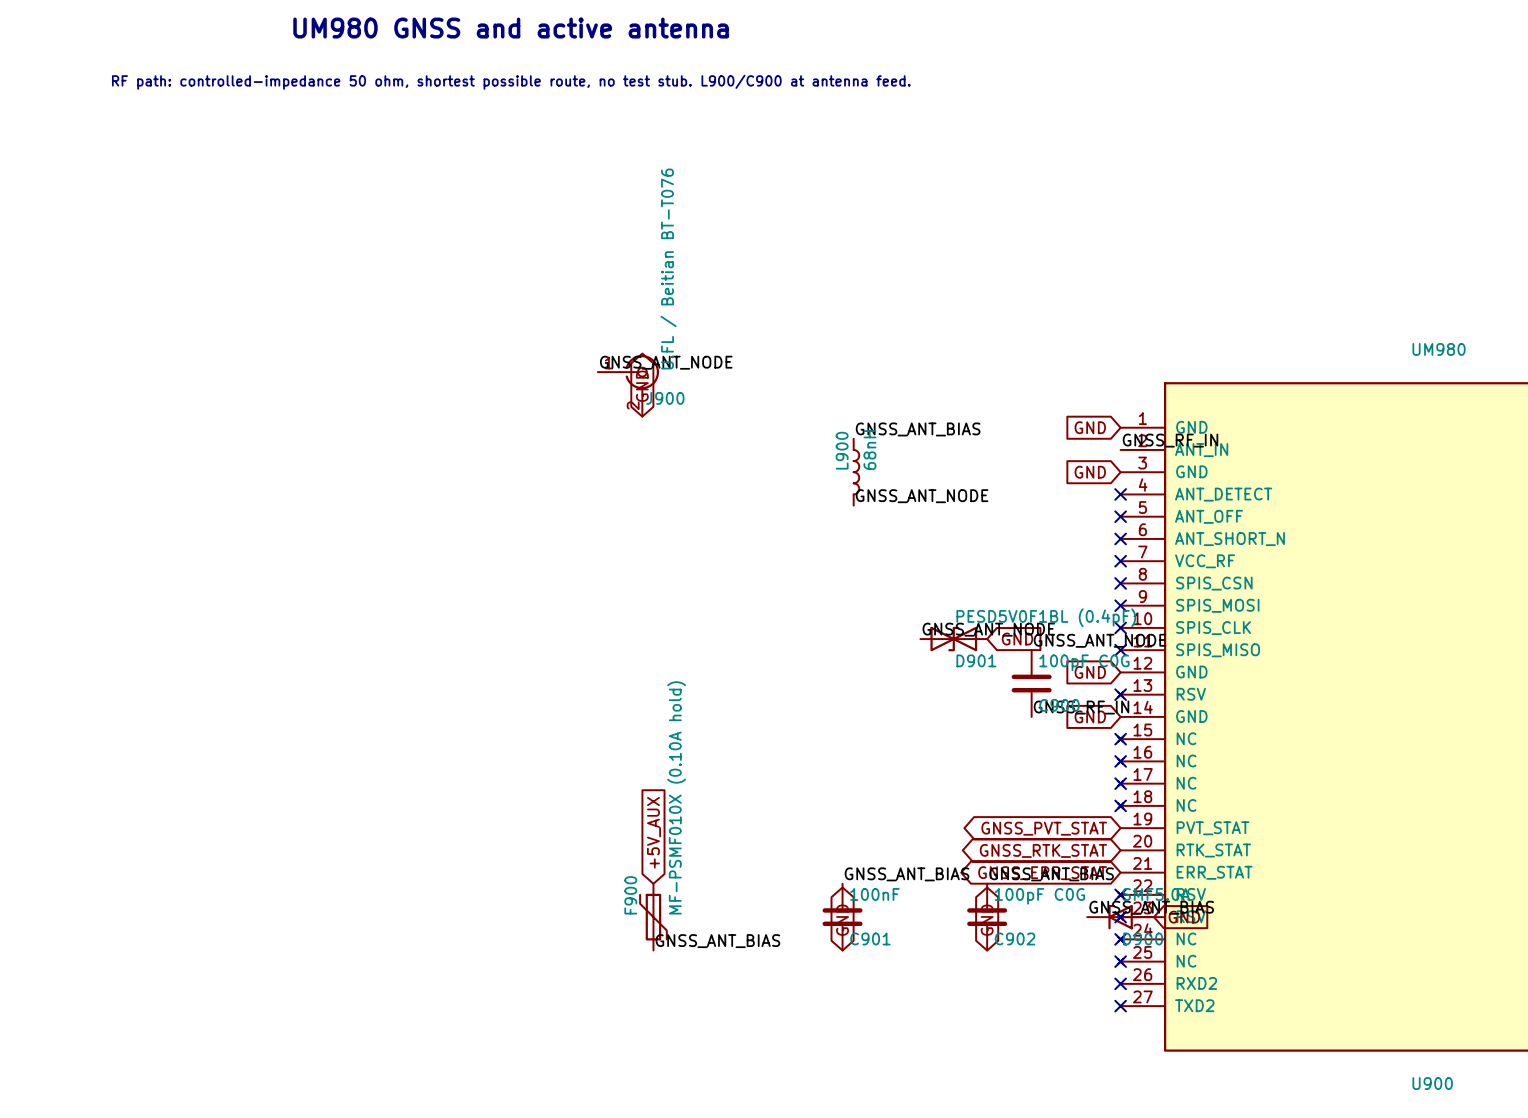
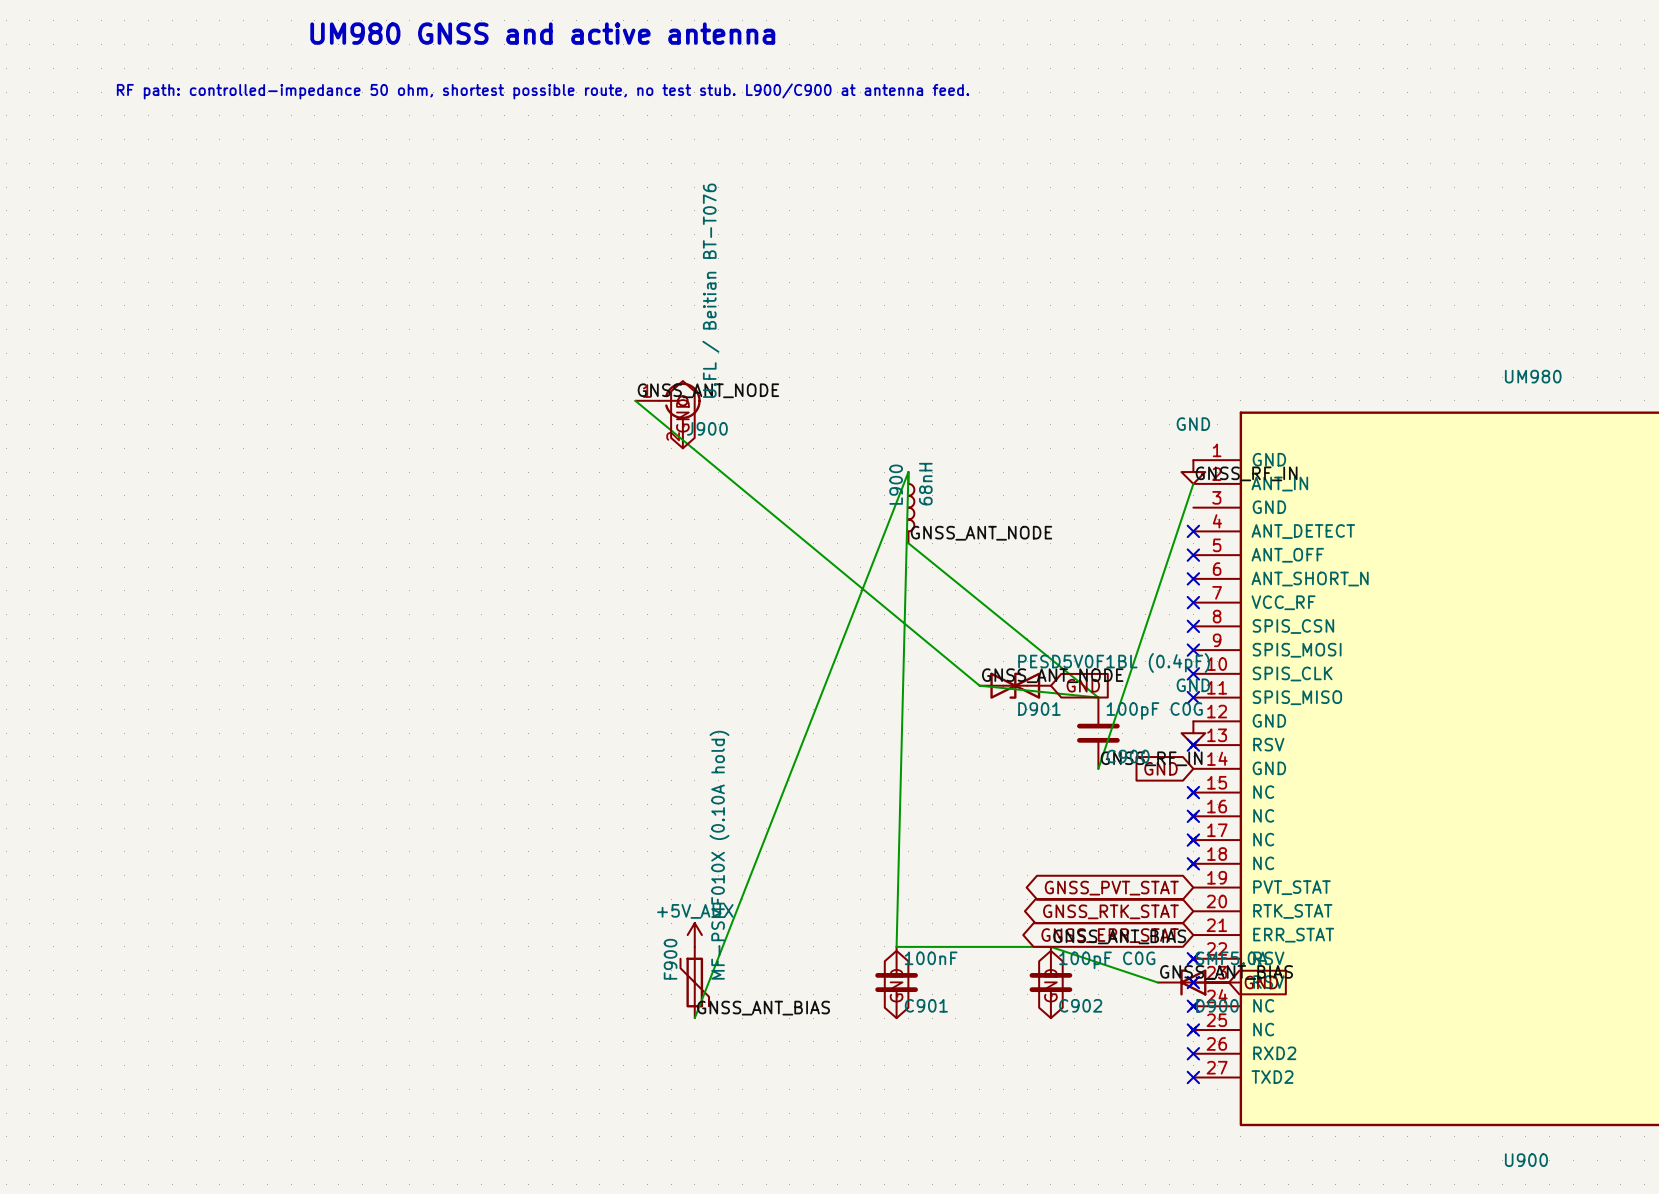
wire: none -> (635, 400) (979, 685) (1098, 697) (908, 543)
global label: GND (1090, 427) -> none
label: GNSS_ANT_BIAS (918, 429) -> none
power symbol: none -> GND (1193, 472)
wire: none -> (1193, 483) (1098, 768)
global label: GND (1090, 472) -> none
label: GNSS_ANT_NODE (1100, 640) -> none
global label: GND (1090, 672) -> none
power symbol: none -> GND (1193, 733)
global label: +5V_AUX (653, 832) -> none
power symbol: none -> +5V_AUX (694, 935)
label: GNSS_ANT_BIAS (906, 874) -> none
wire: none -> (1157, 982) (1050, 946) (896, 946) (908, 472) (694, 1018)

